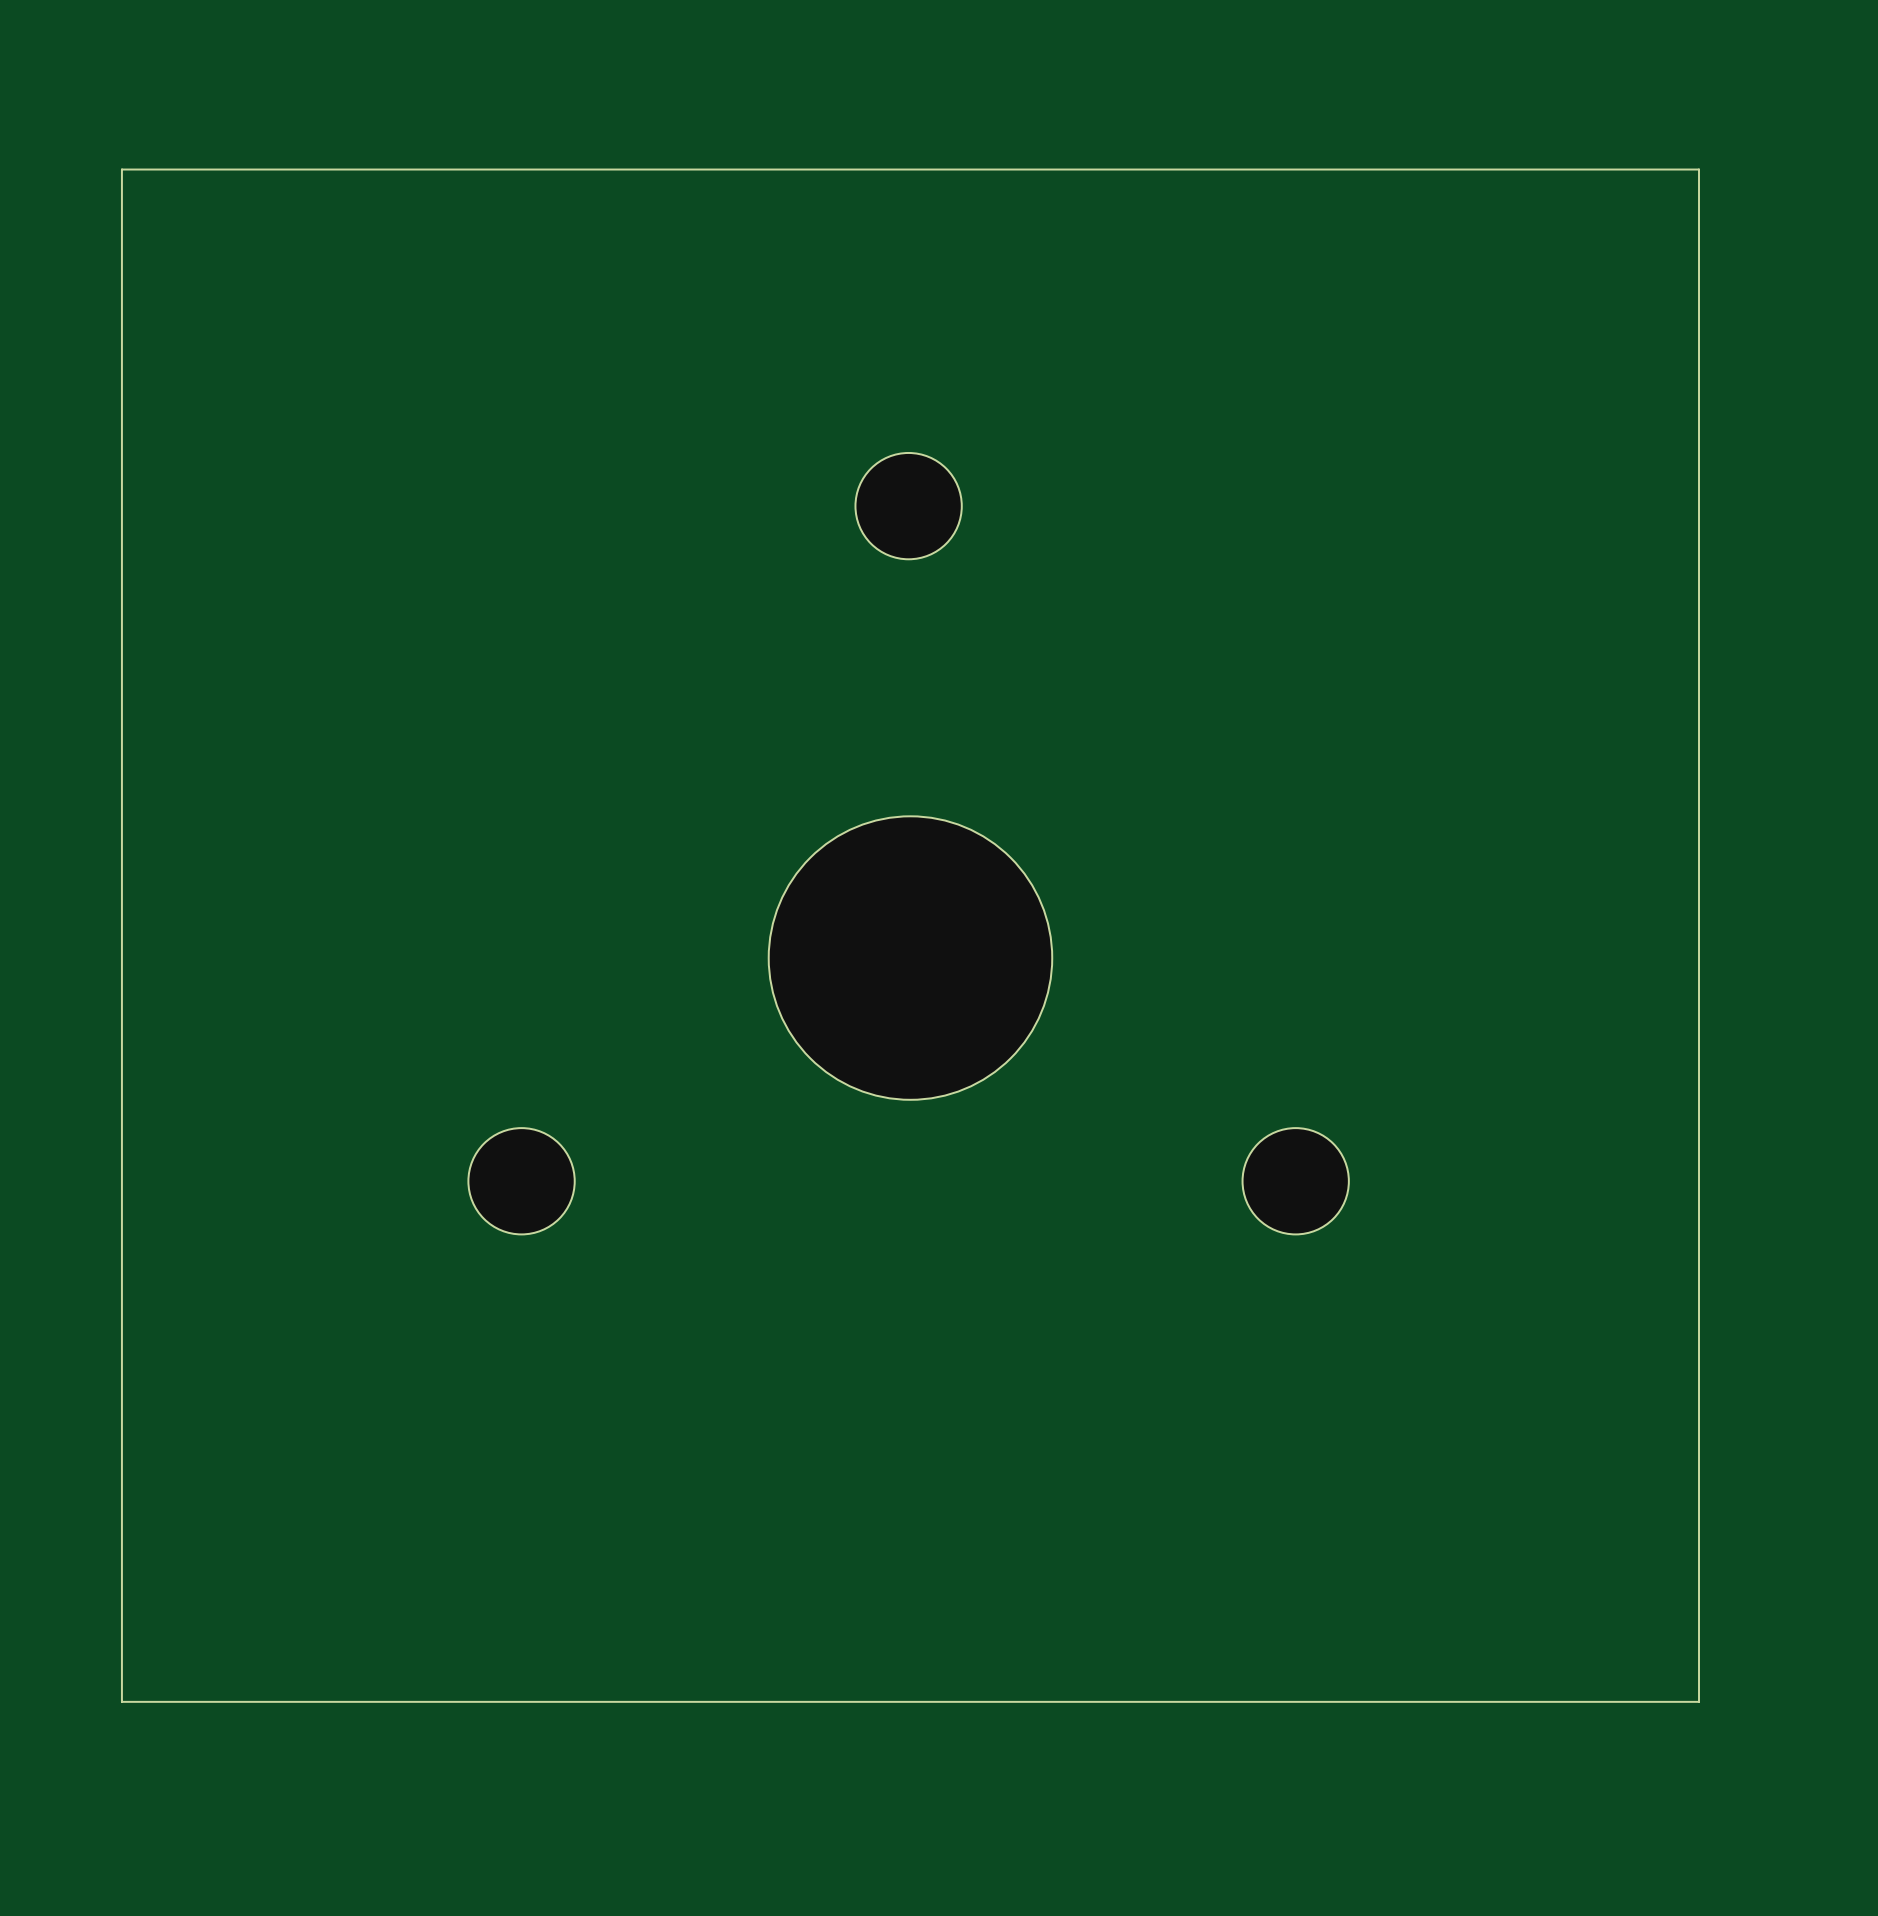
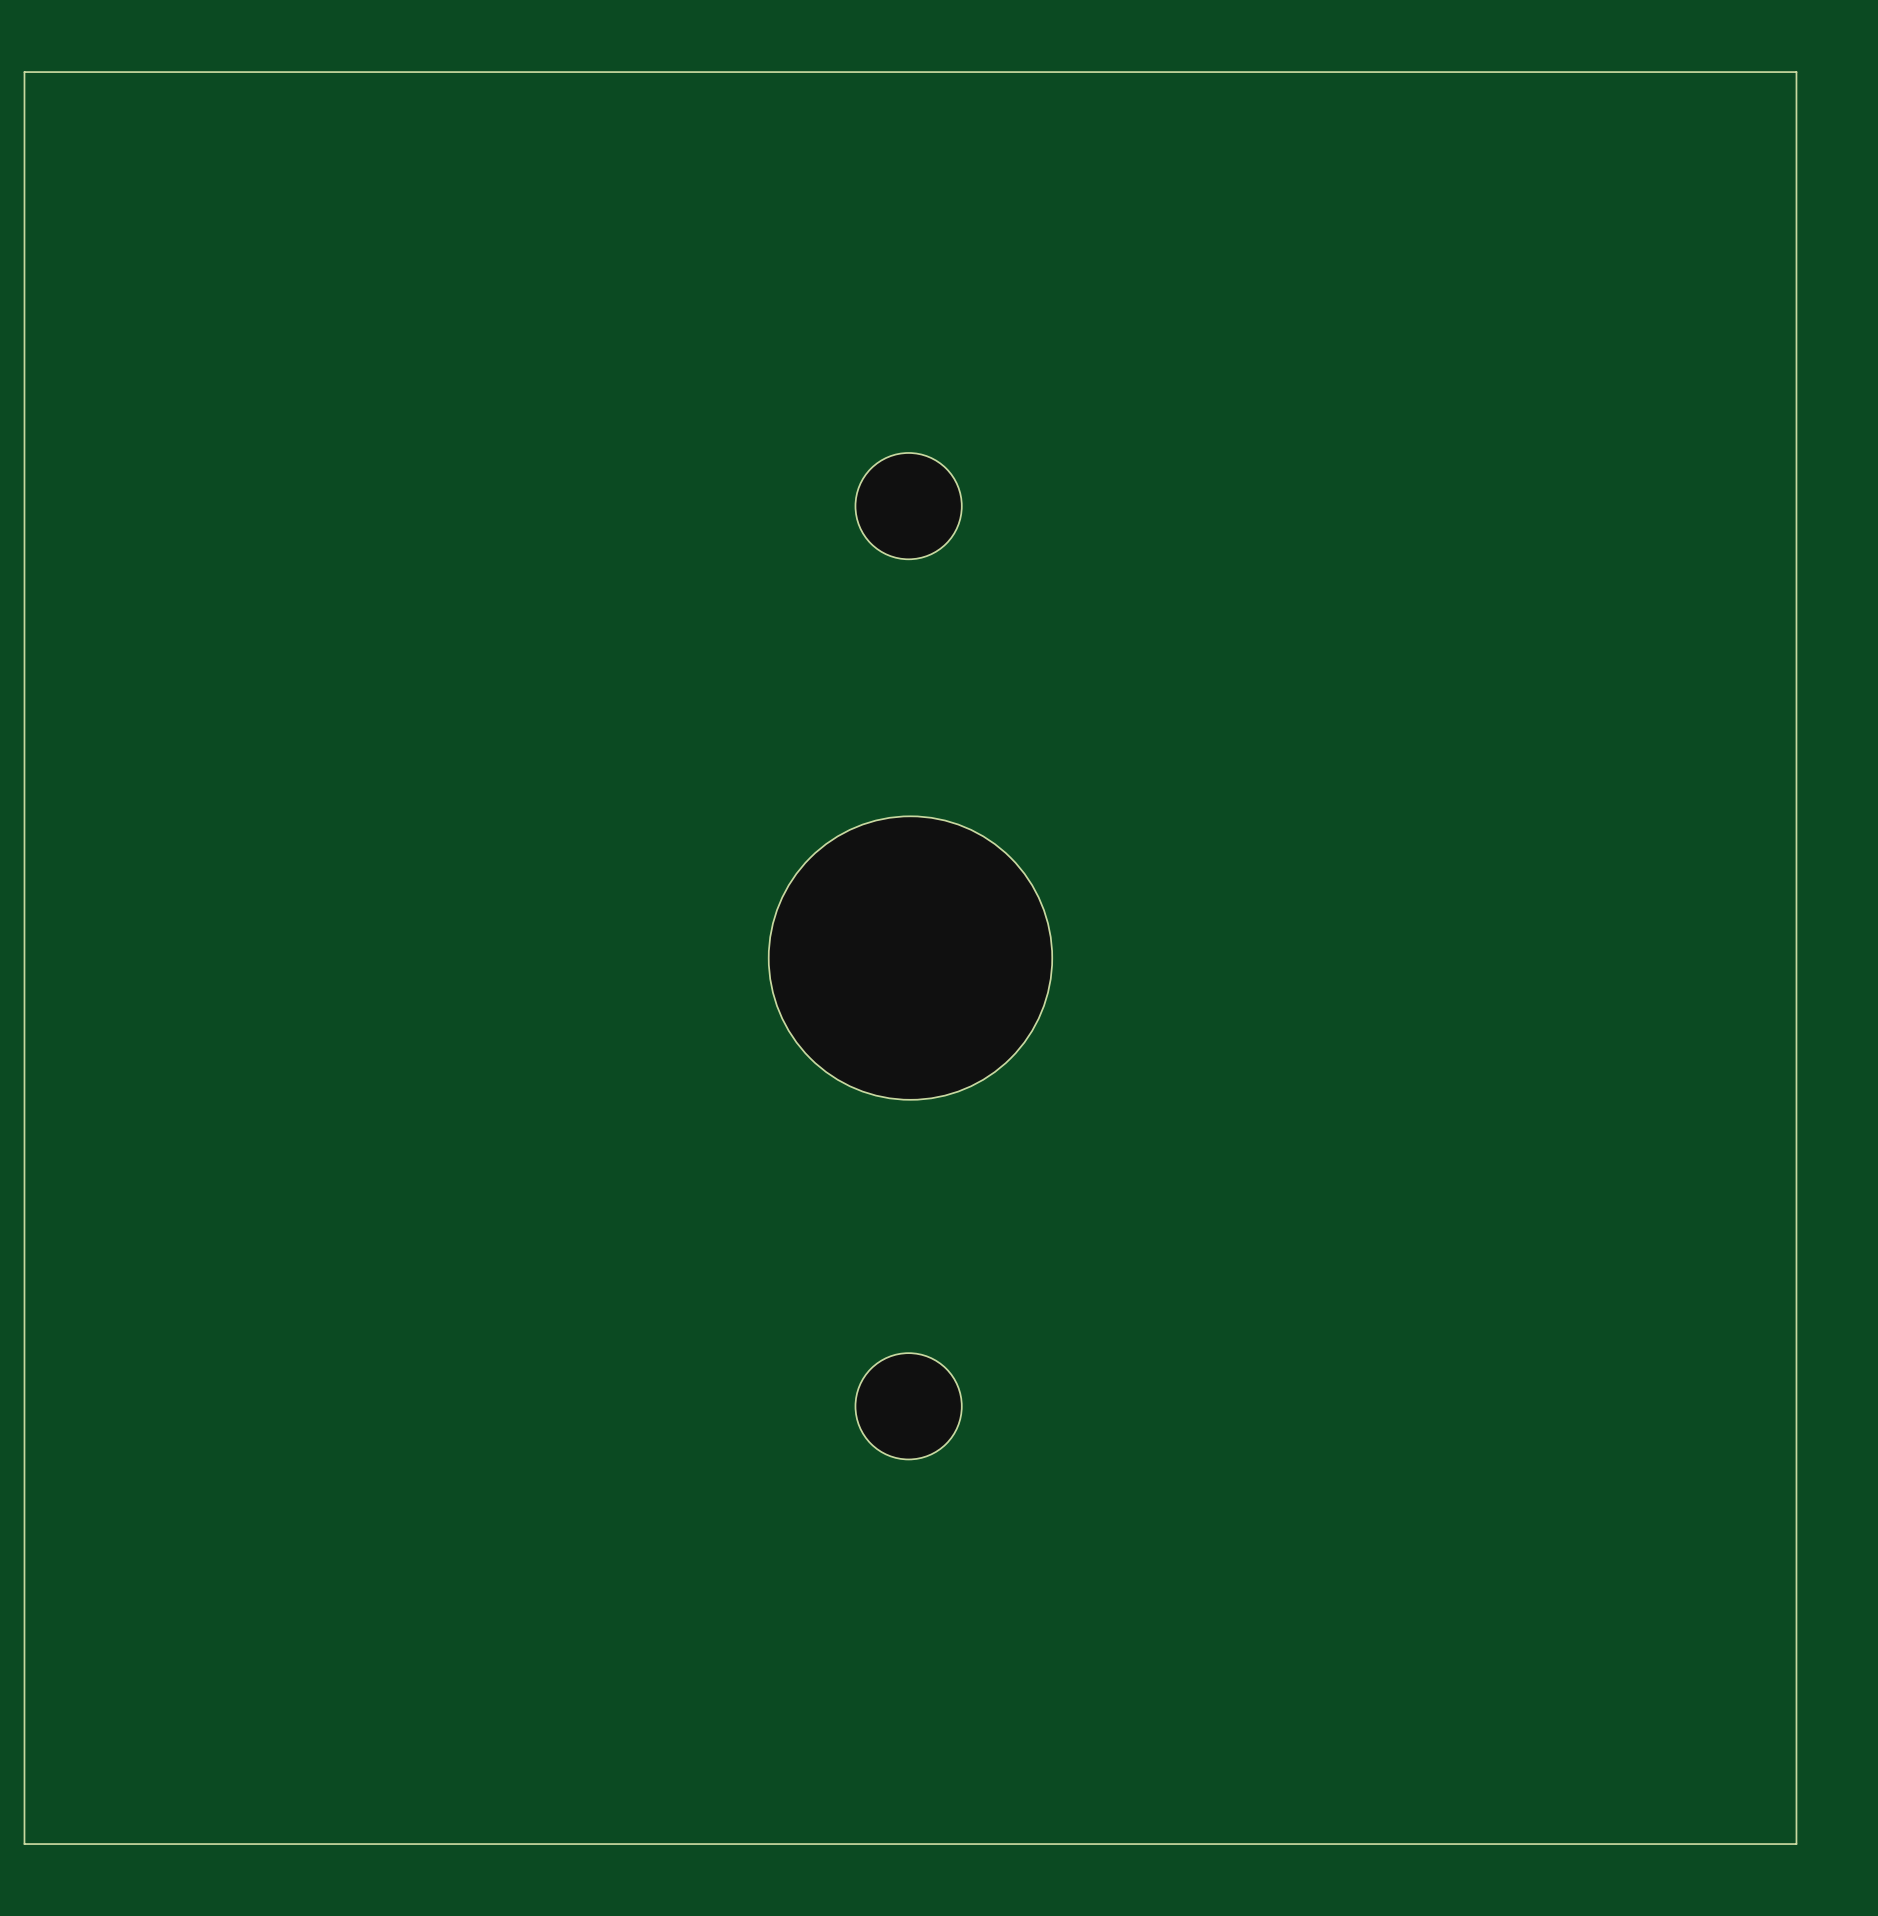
board edge: (1699, 169) (1699, 1701) (121, 1701) (121, 169) (1699, 169) -> (1796, 72) (1796, 1844) (24, 1844) (24, 72) (1796, 72)
hole: (521, 1181) -> none
hole: (1295, 1181) -> none
hole: none -> (908, 1406)

